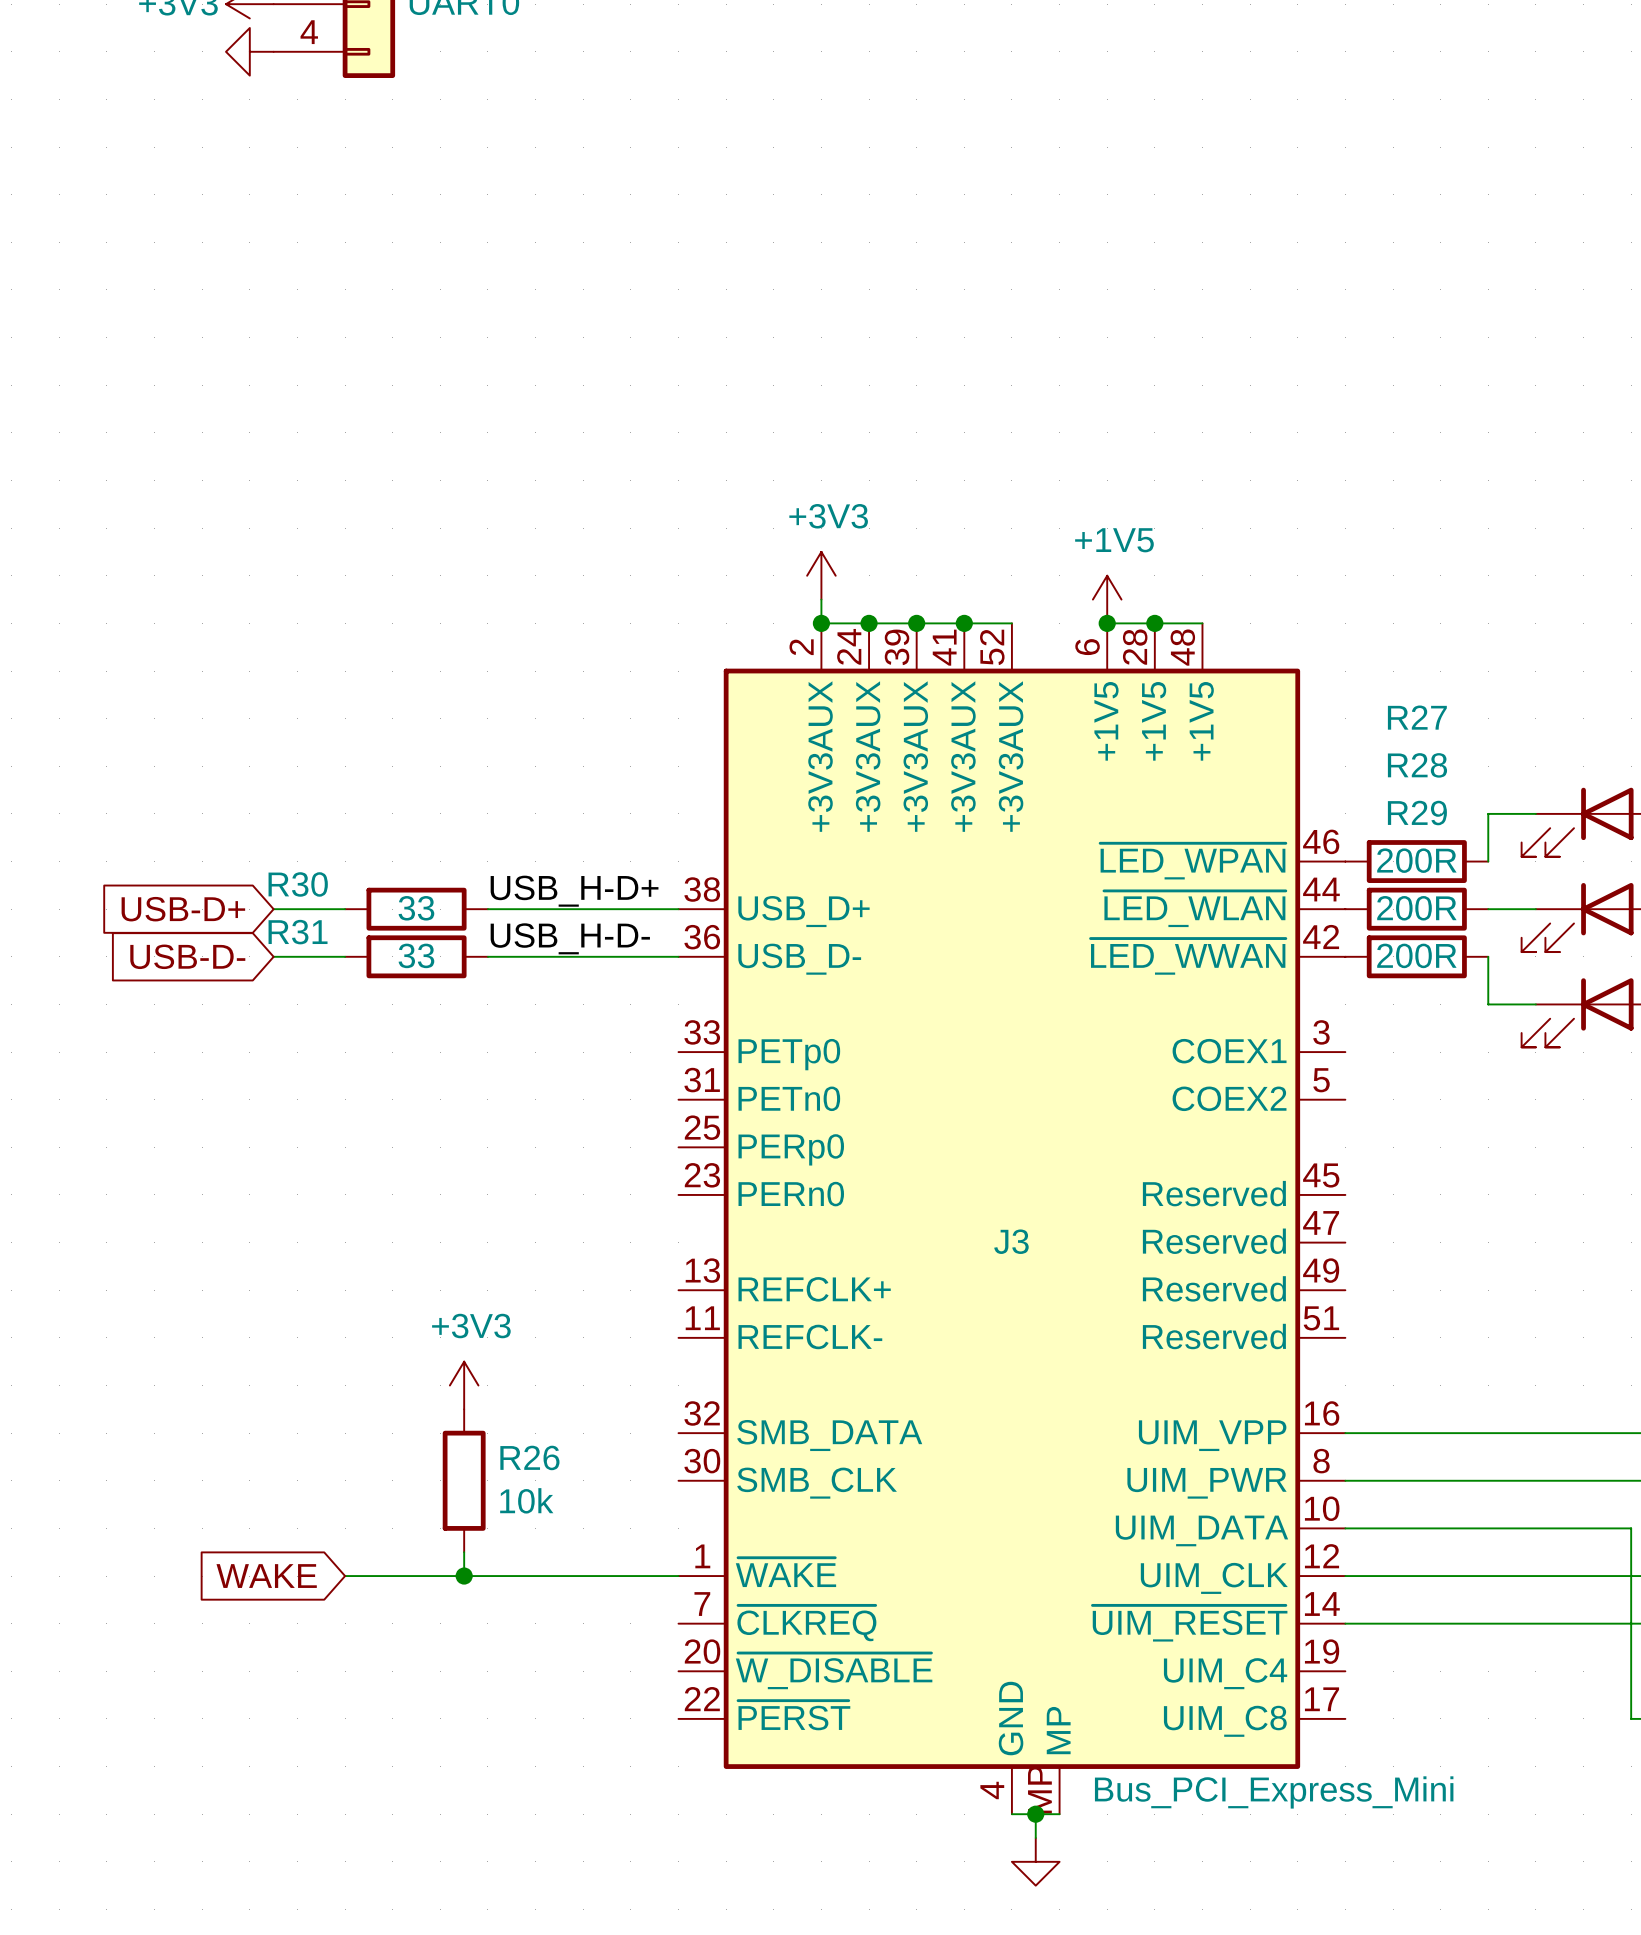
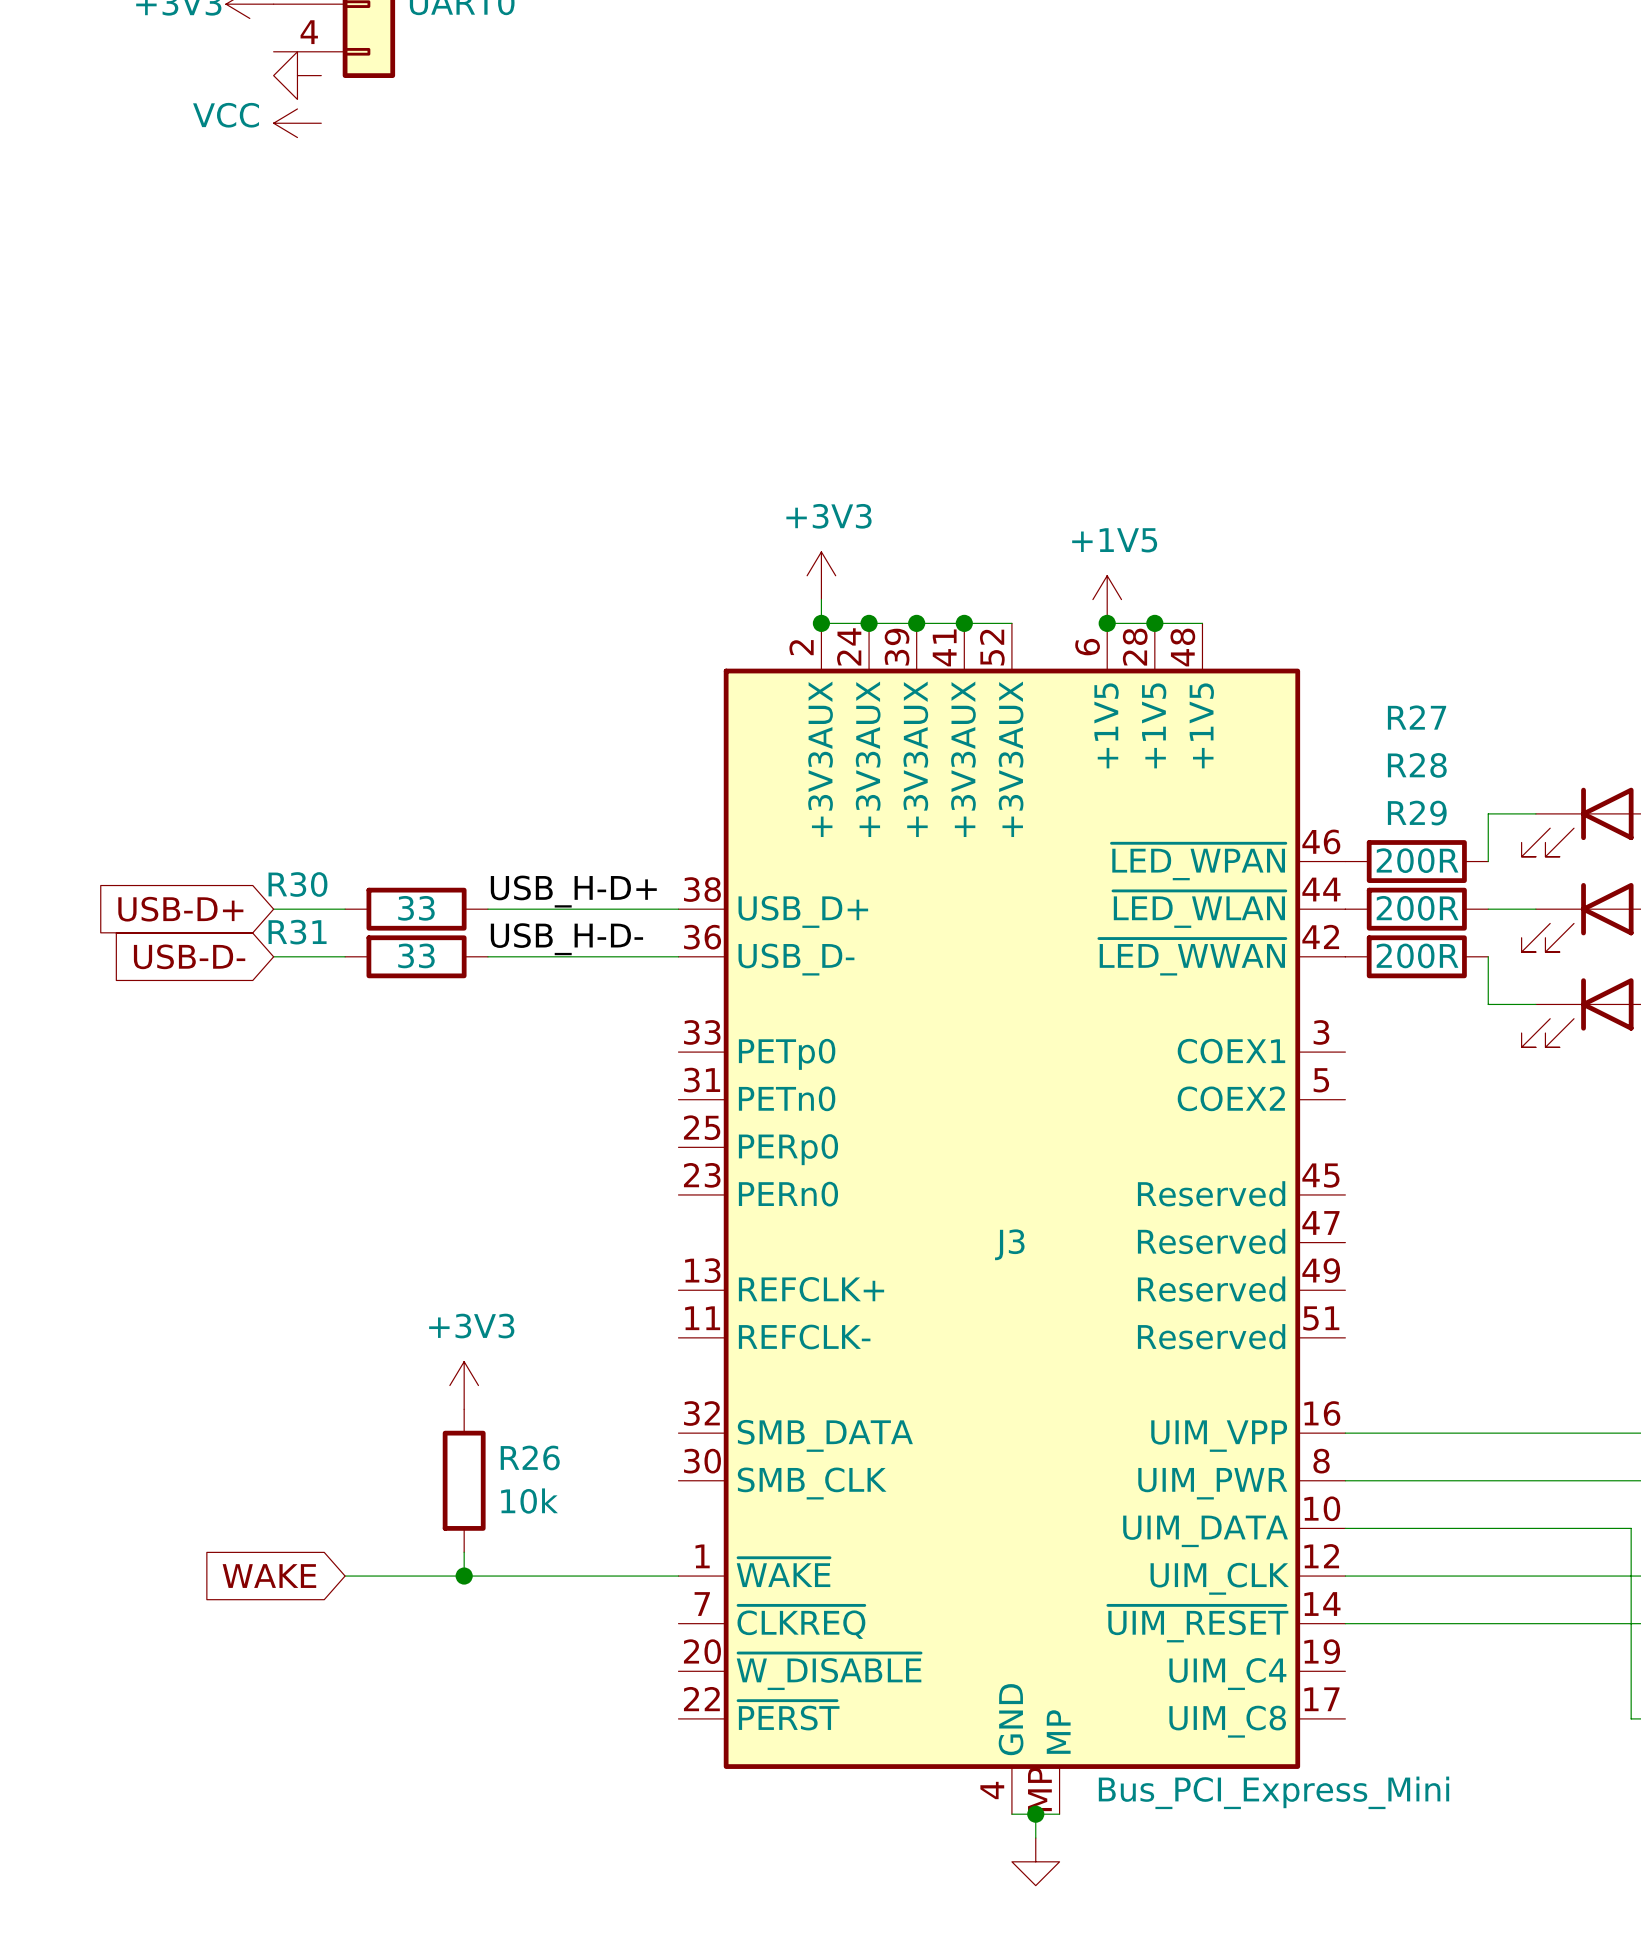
power symbol position: (249, 51) -> (297, 75)
power symbol: none -> VCC (297, 123)

